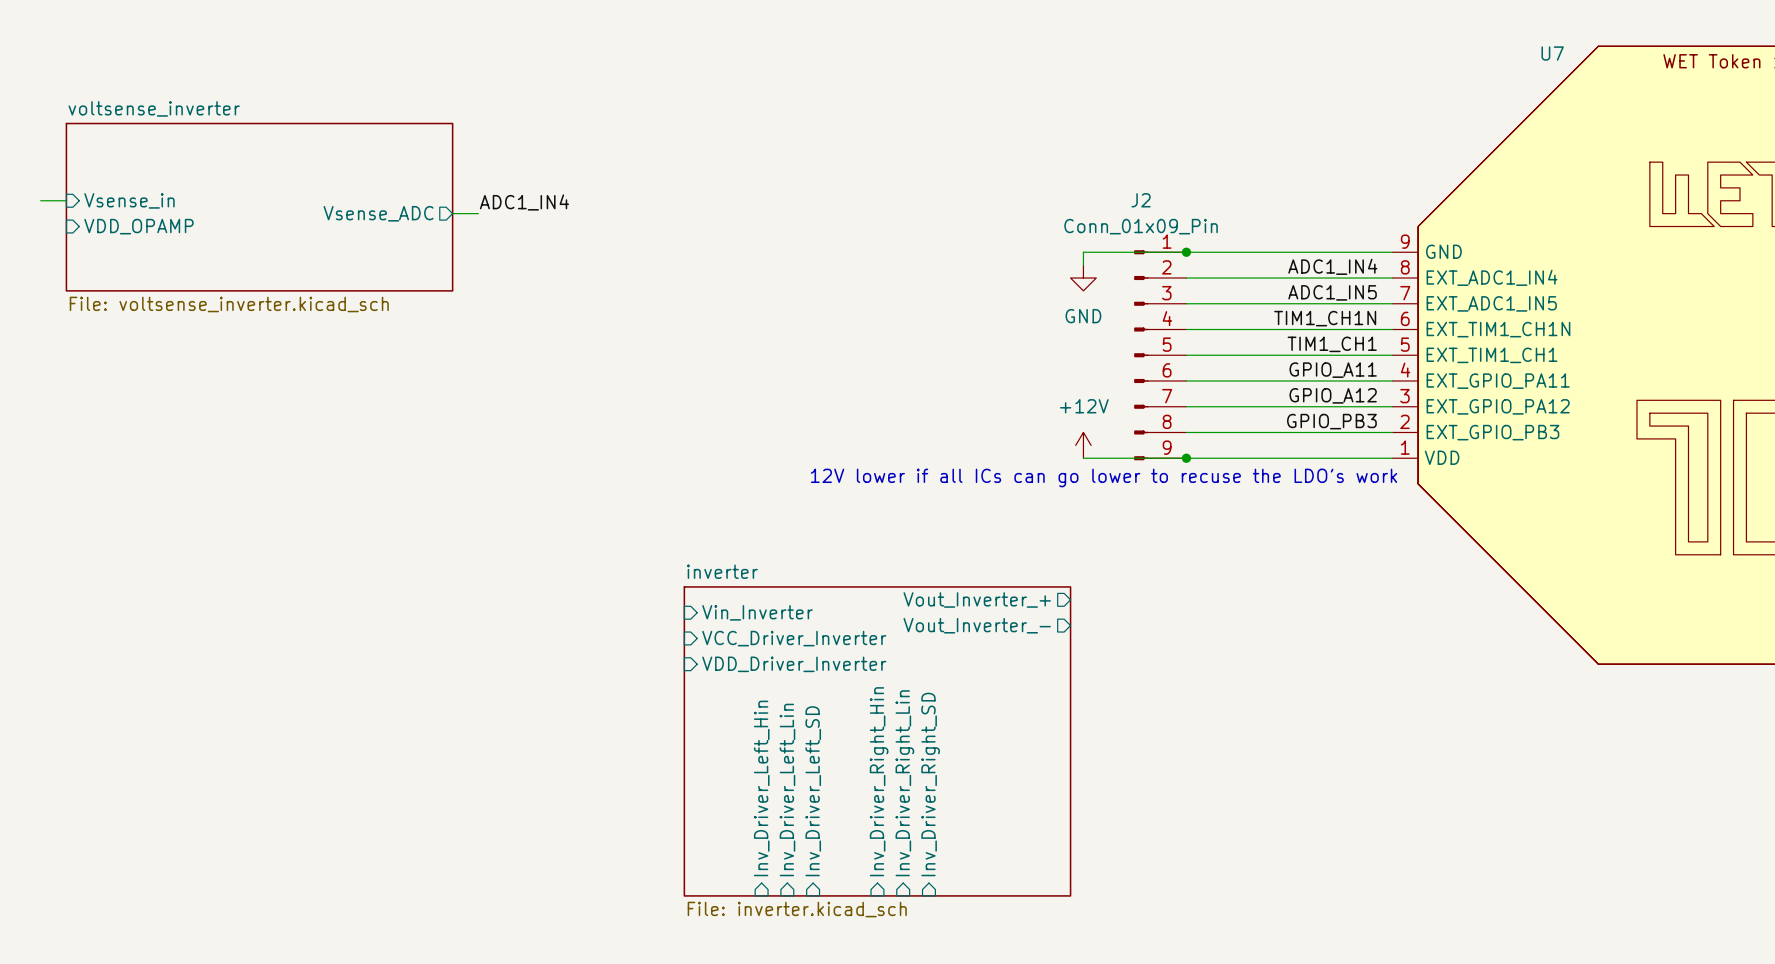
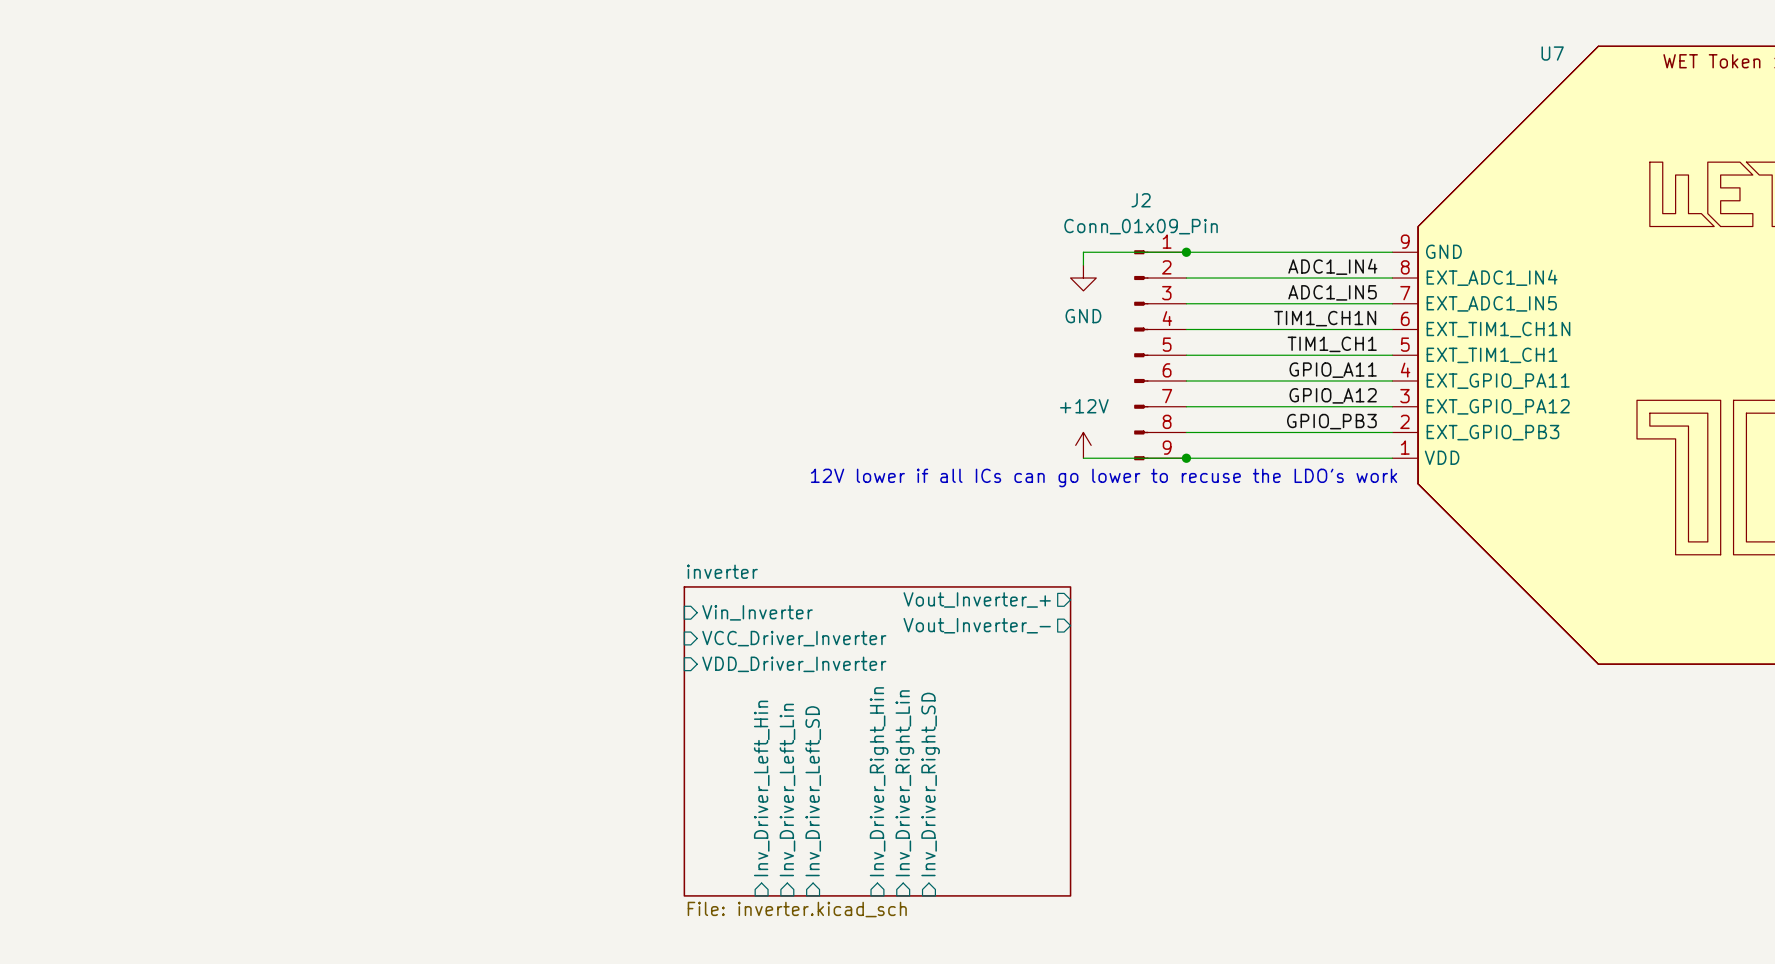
wire: (40, 200) (66, 200) -> none
sheet pin: Vsense_in (129, 200) -> none
label: ADC1_IN4 (524, 202) -> none
sheet voltsense_inverter: File: voltsense_inverter.kicad_sch (259, 207) -> none
sheet pin: Vsense_ADC (378, 213) -> none
wire: (452, 213) (478, 213) -> none
sheet pin: VDD_OPAMP (138, 226) -> none

